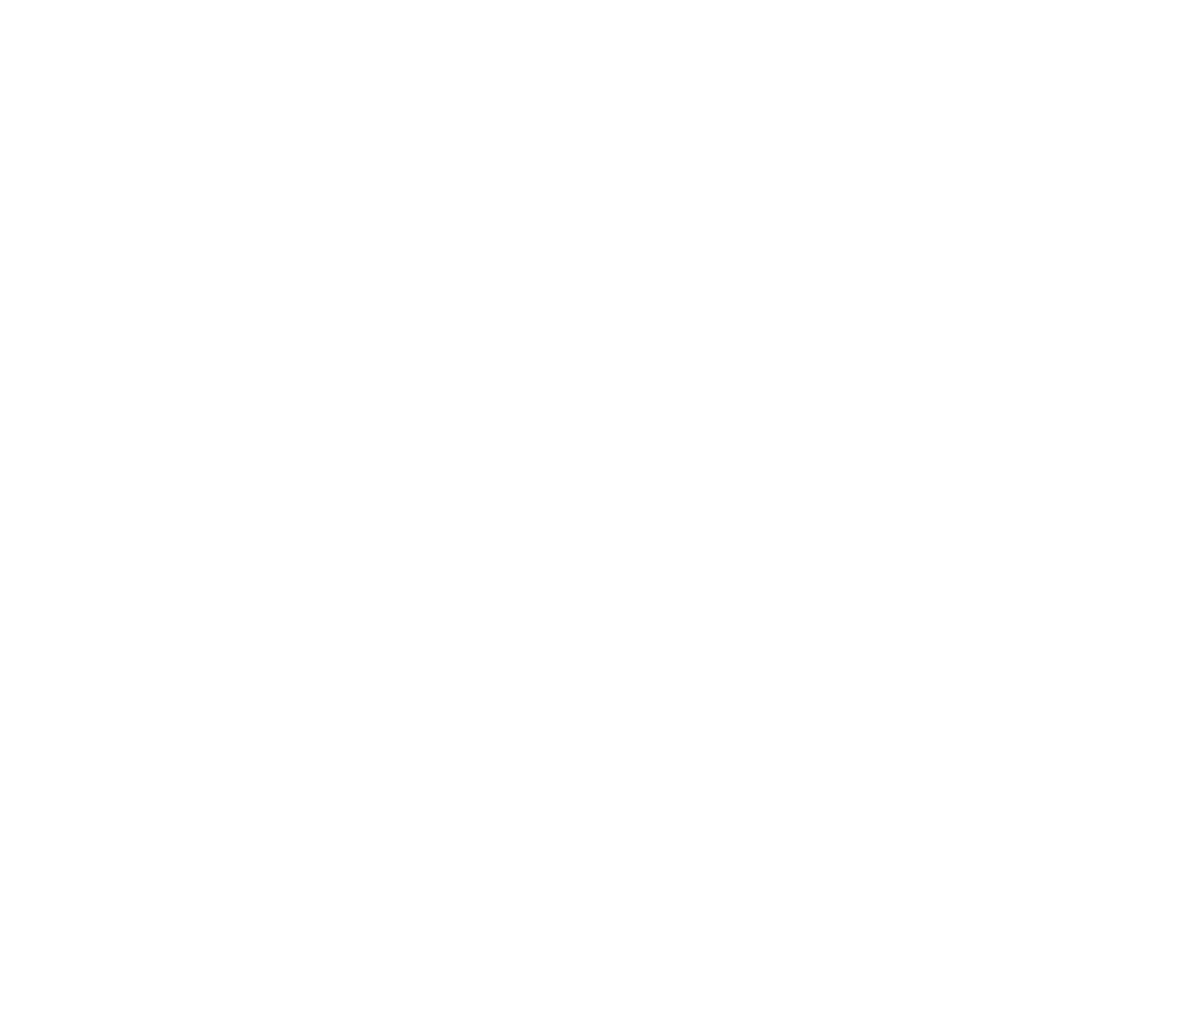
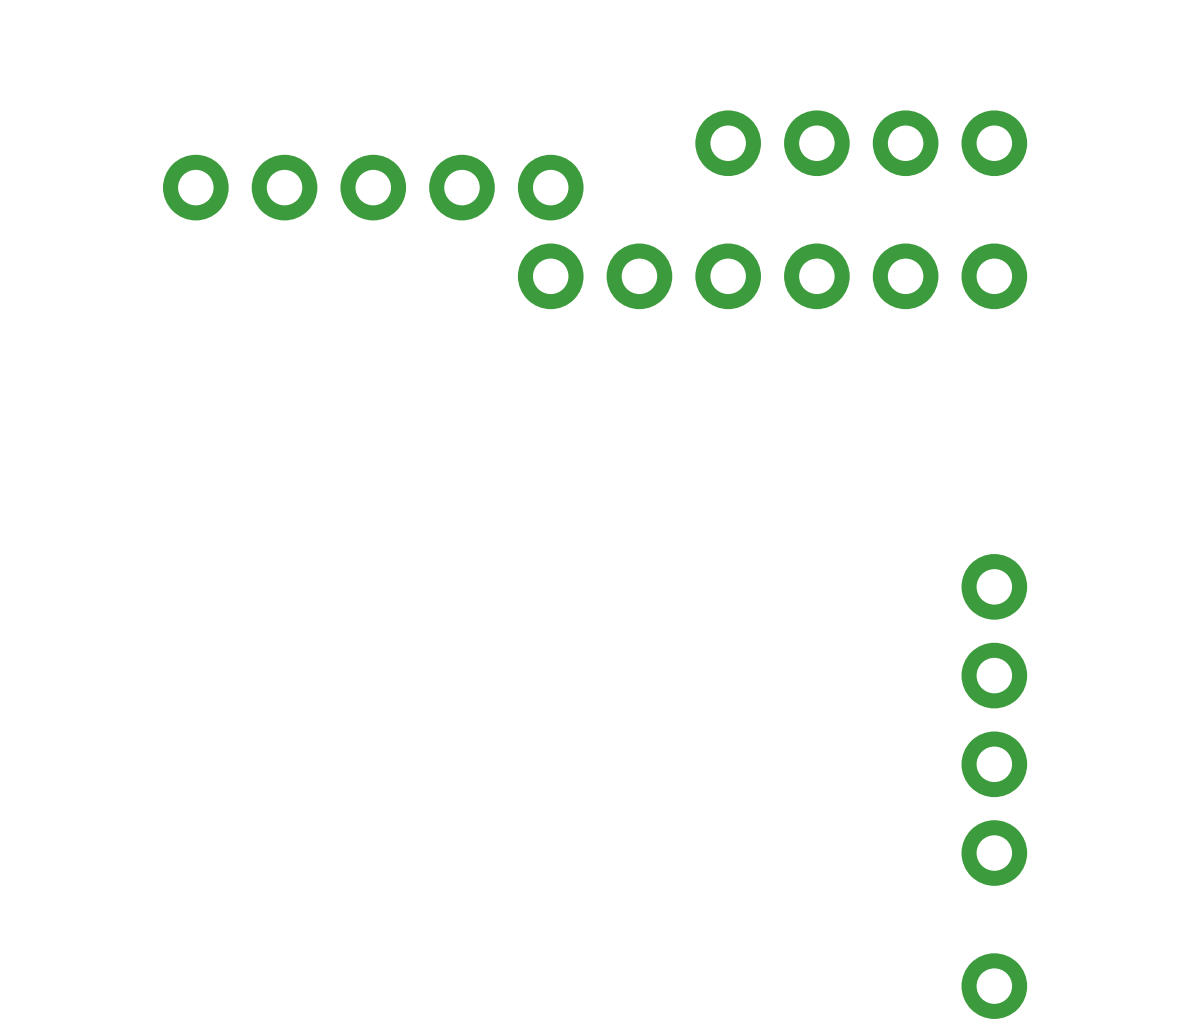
part: none -> (861, 143)
part: none -> (373, 187)
part: none -> (772, 276)
part: none -> (994, 719)
part: none -> (994, 986)

